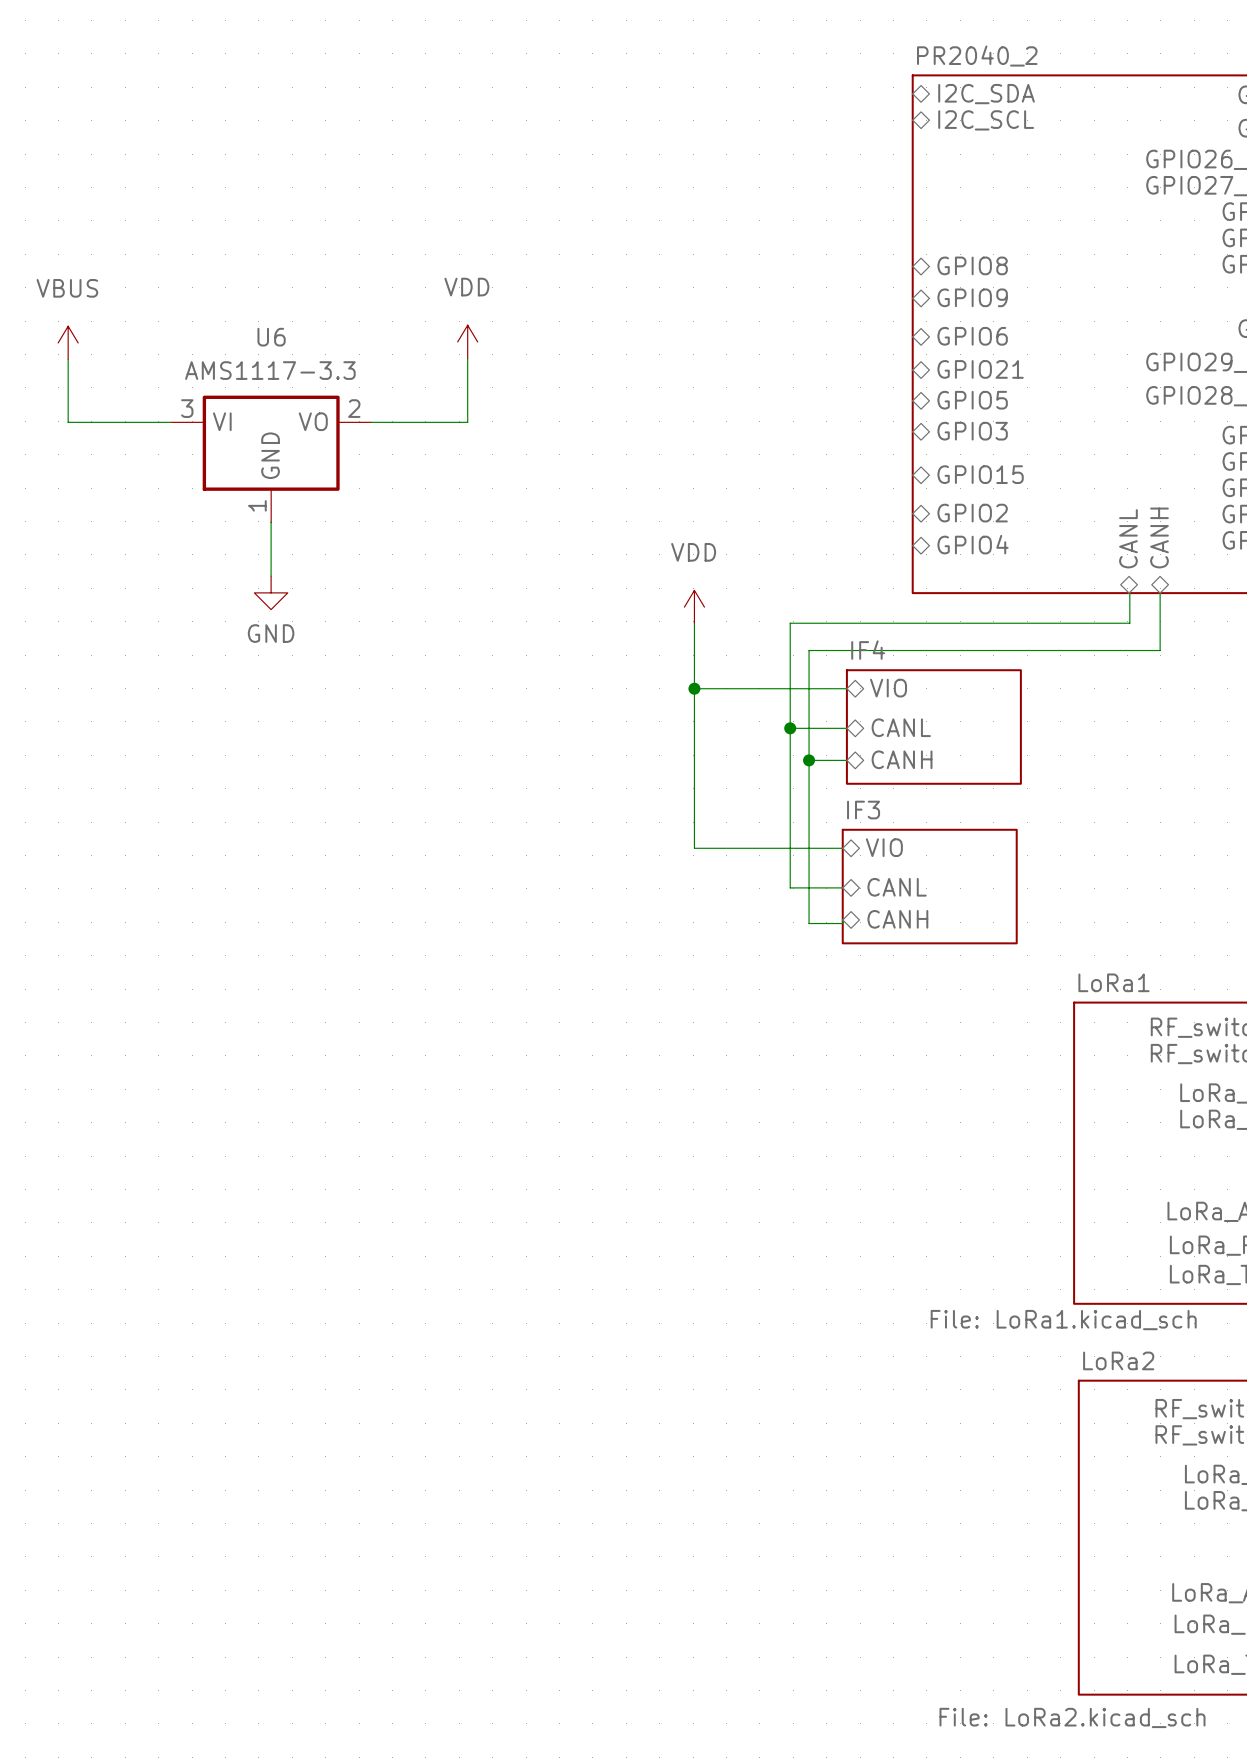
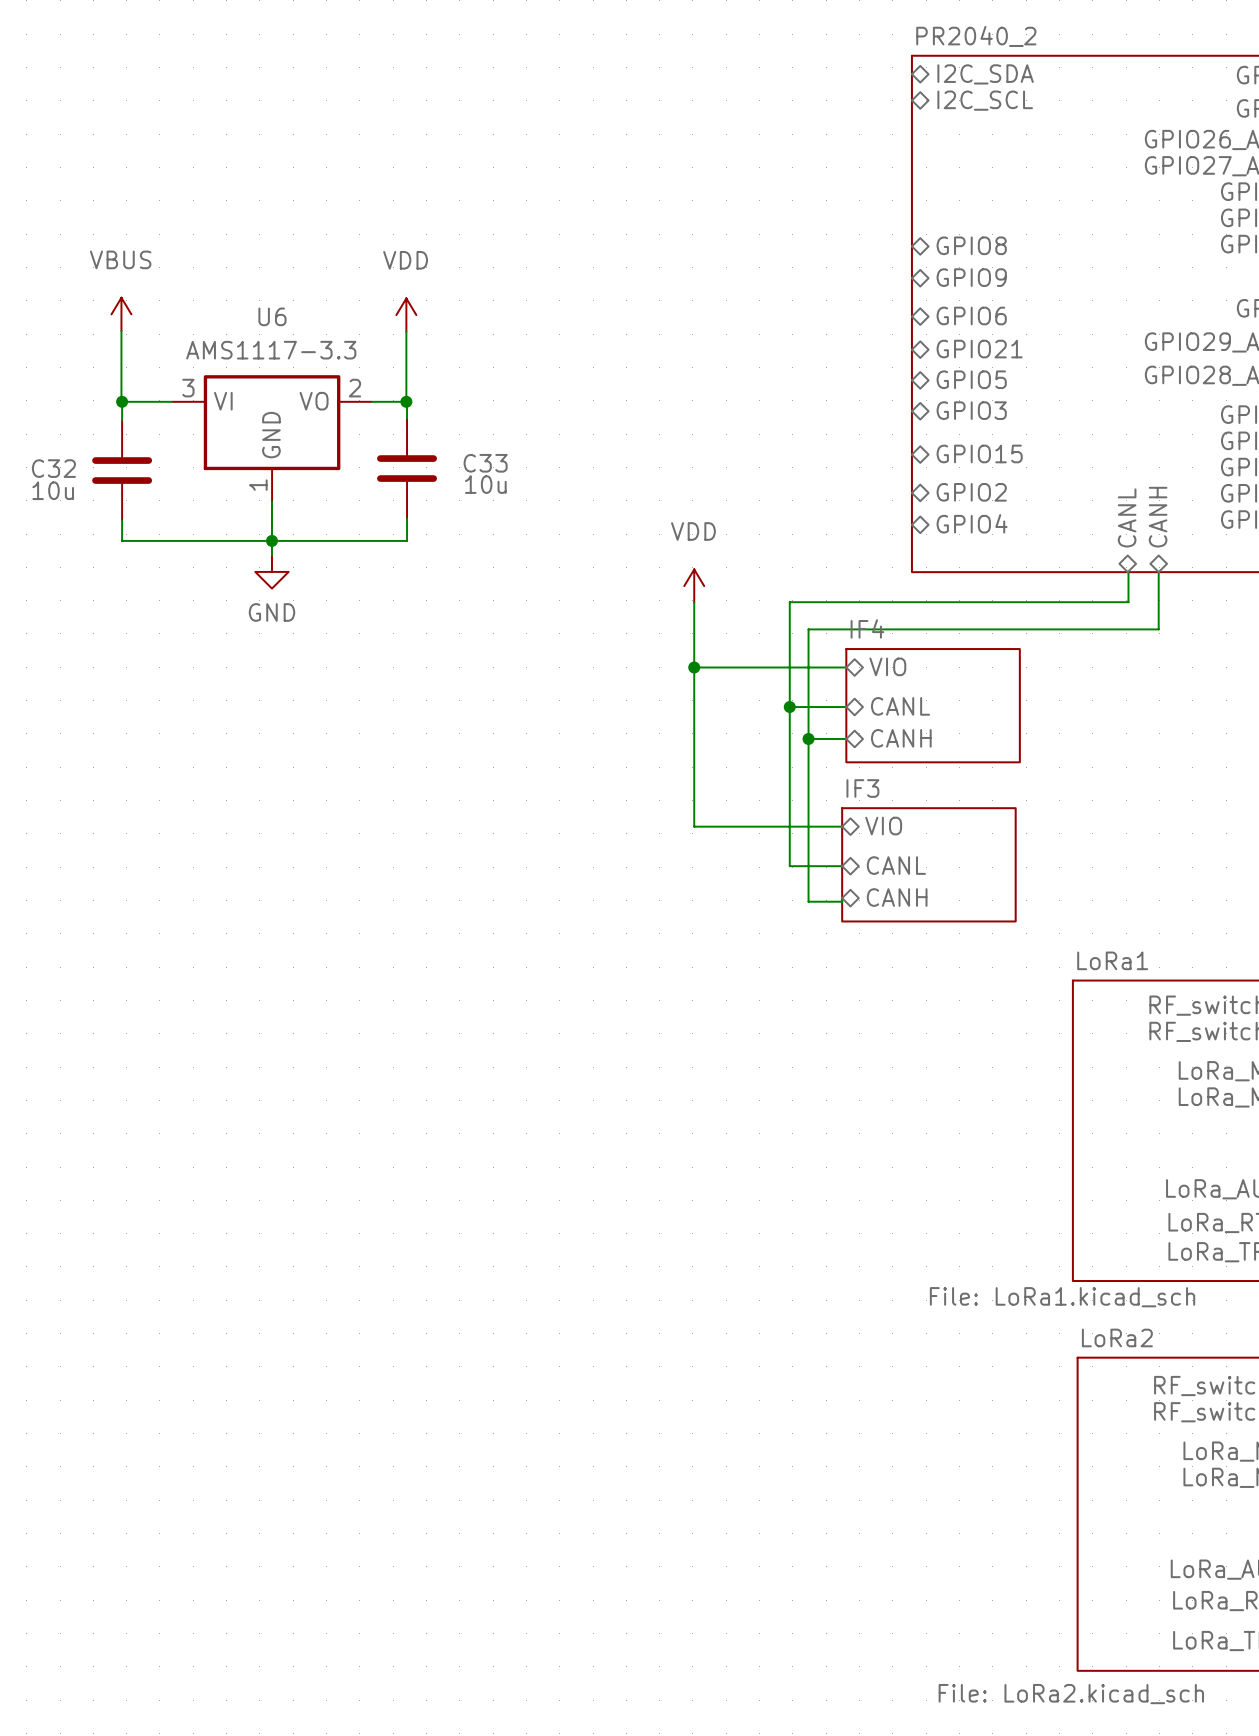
power symbol position: VDD (467, 341) -> VDD (406, 315)
power symbol position: VBUS (68, 342) -> VBUS (121, 314)
wire: none -> (406, 331) (406, 401)
wire: (467, 358) (467, 422) (406, 422) -> (407, 418) (407, 401)
wire: (68, 359) (68, 422) (120, 422) -> (121, 331) (121, 401)
wire: none -> (122, 401) (122, 420)
junction: none -> (122, 401)
junction: none -> (406, 401)
C33: none -> 10u (407, 468)
C32: none -> 10u (122, 470)
wire: none -> (407, 518) (407, 540) (122, 540) (122, 520)
junction: none -> (271, 540)

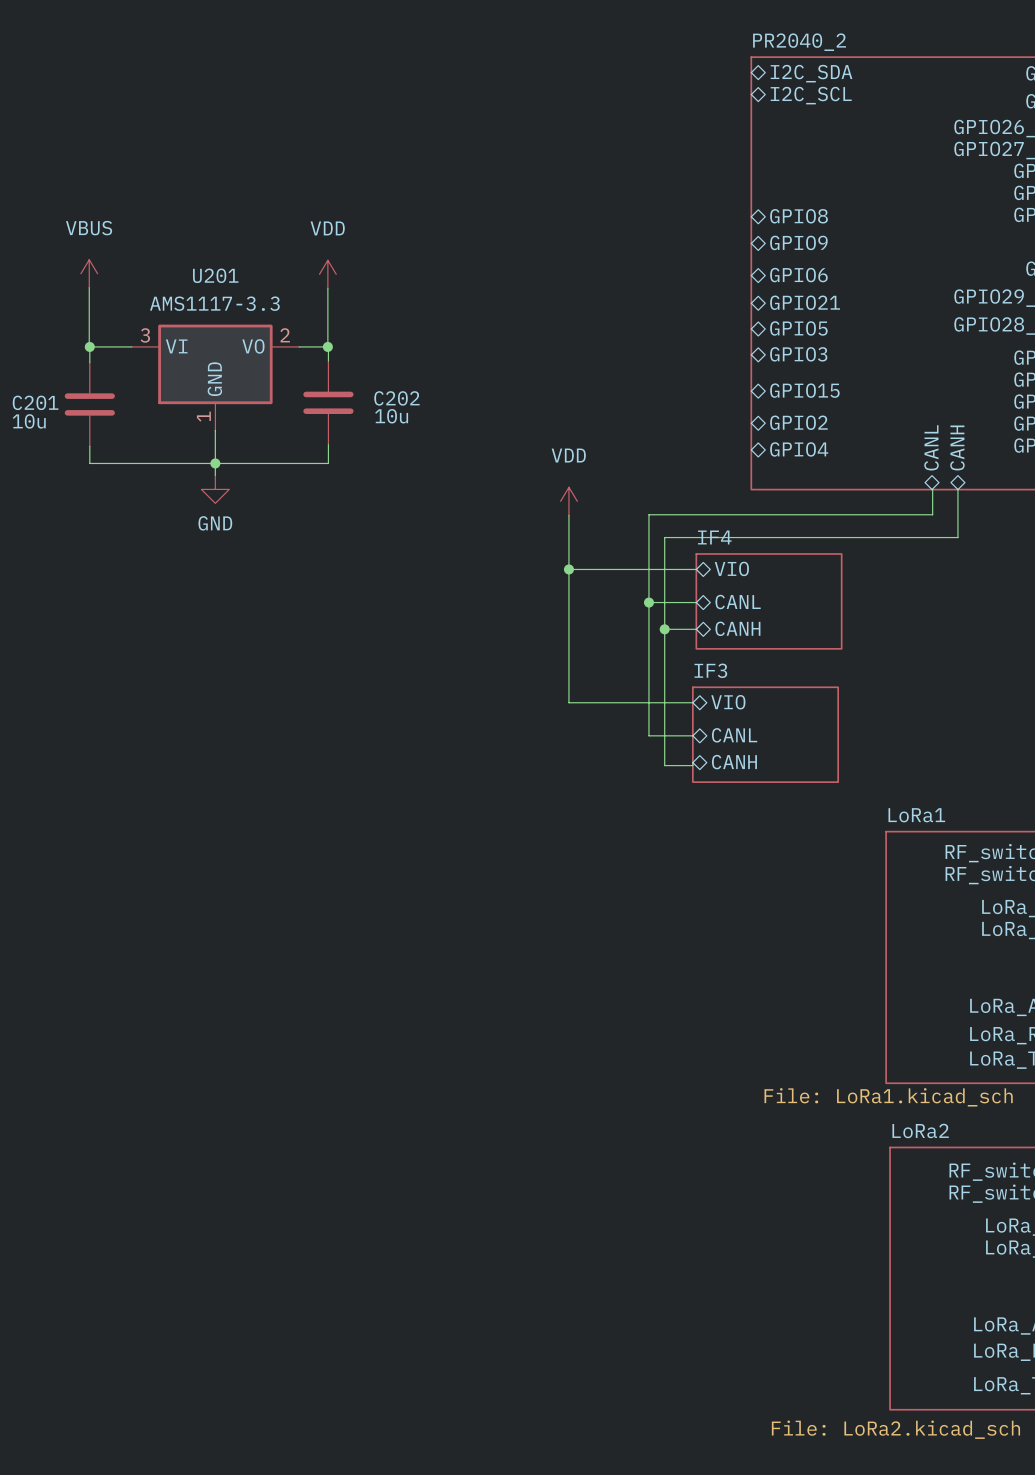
U6 name: U6 (272, 316) -> U201 (215, 275)
C33 name: C33 (485, 463) -> C202 (396, 398)
C32 name: C32 (53, 468) -> C201 (35, 402)

